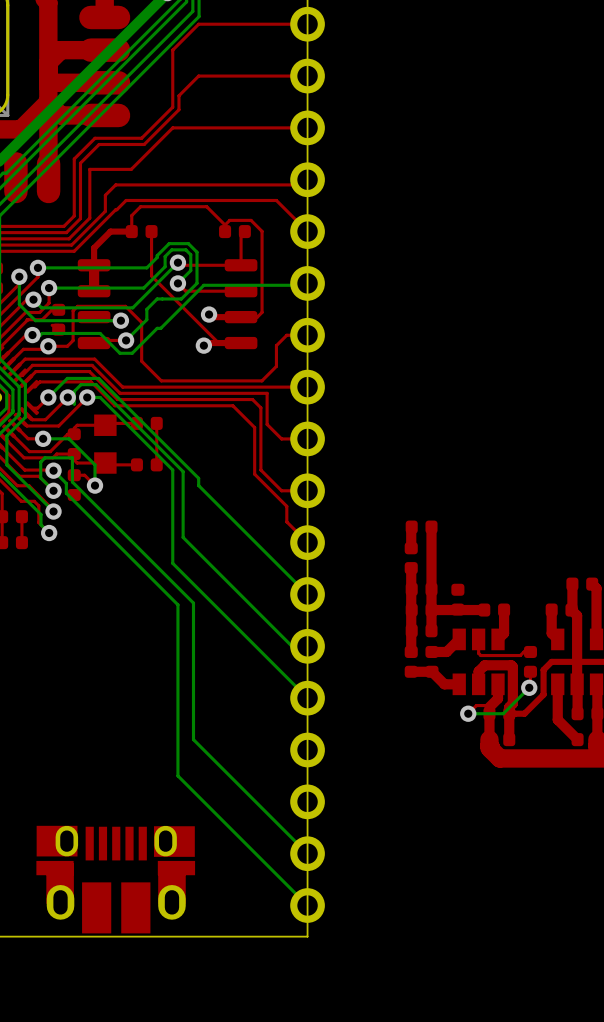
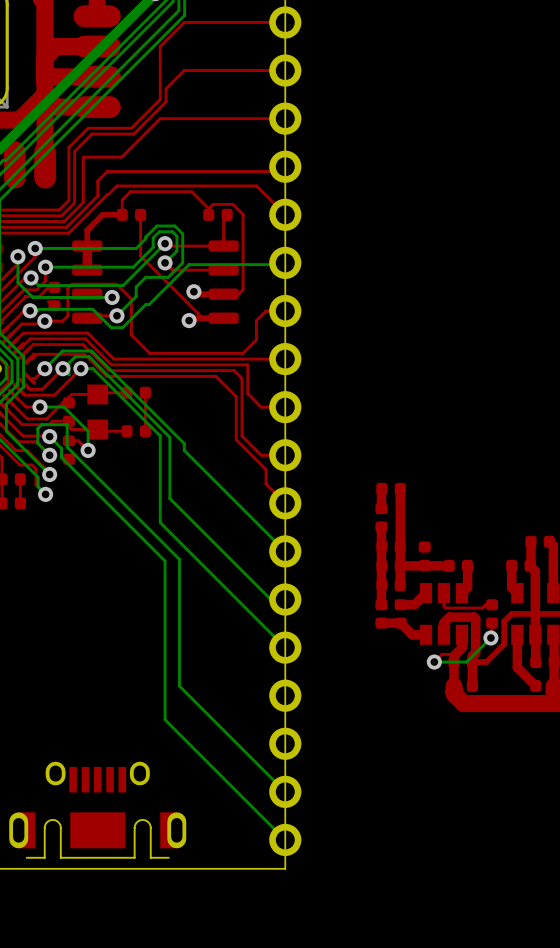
part footprint: [36, 825, 196, 934] -> [9, 761, 187, 859]

